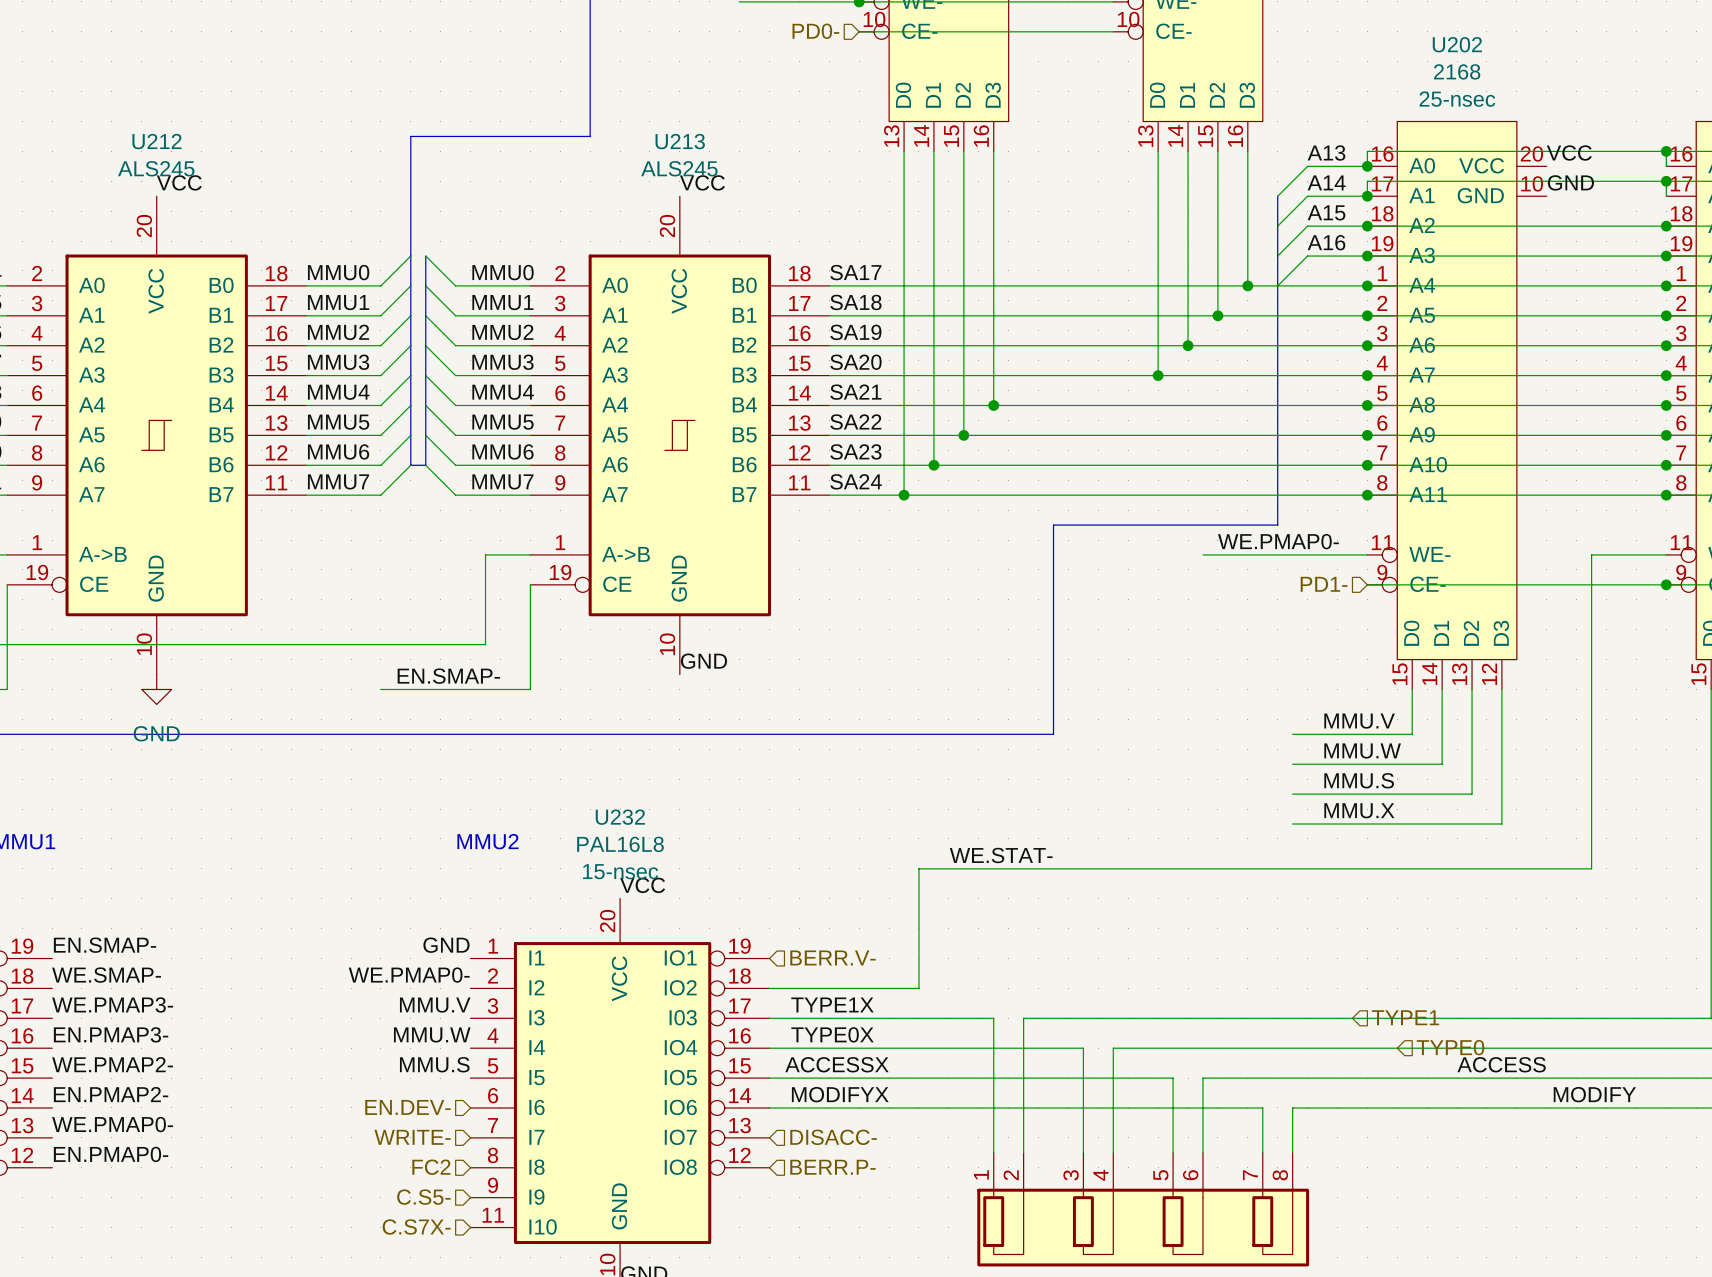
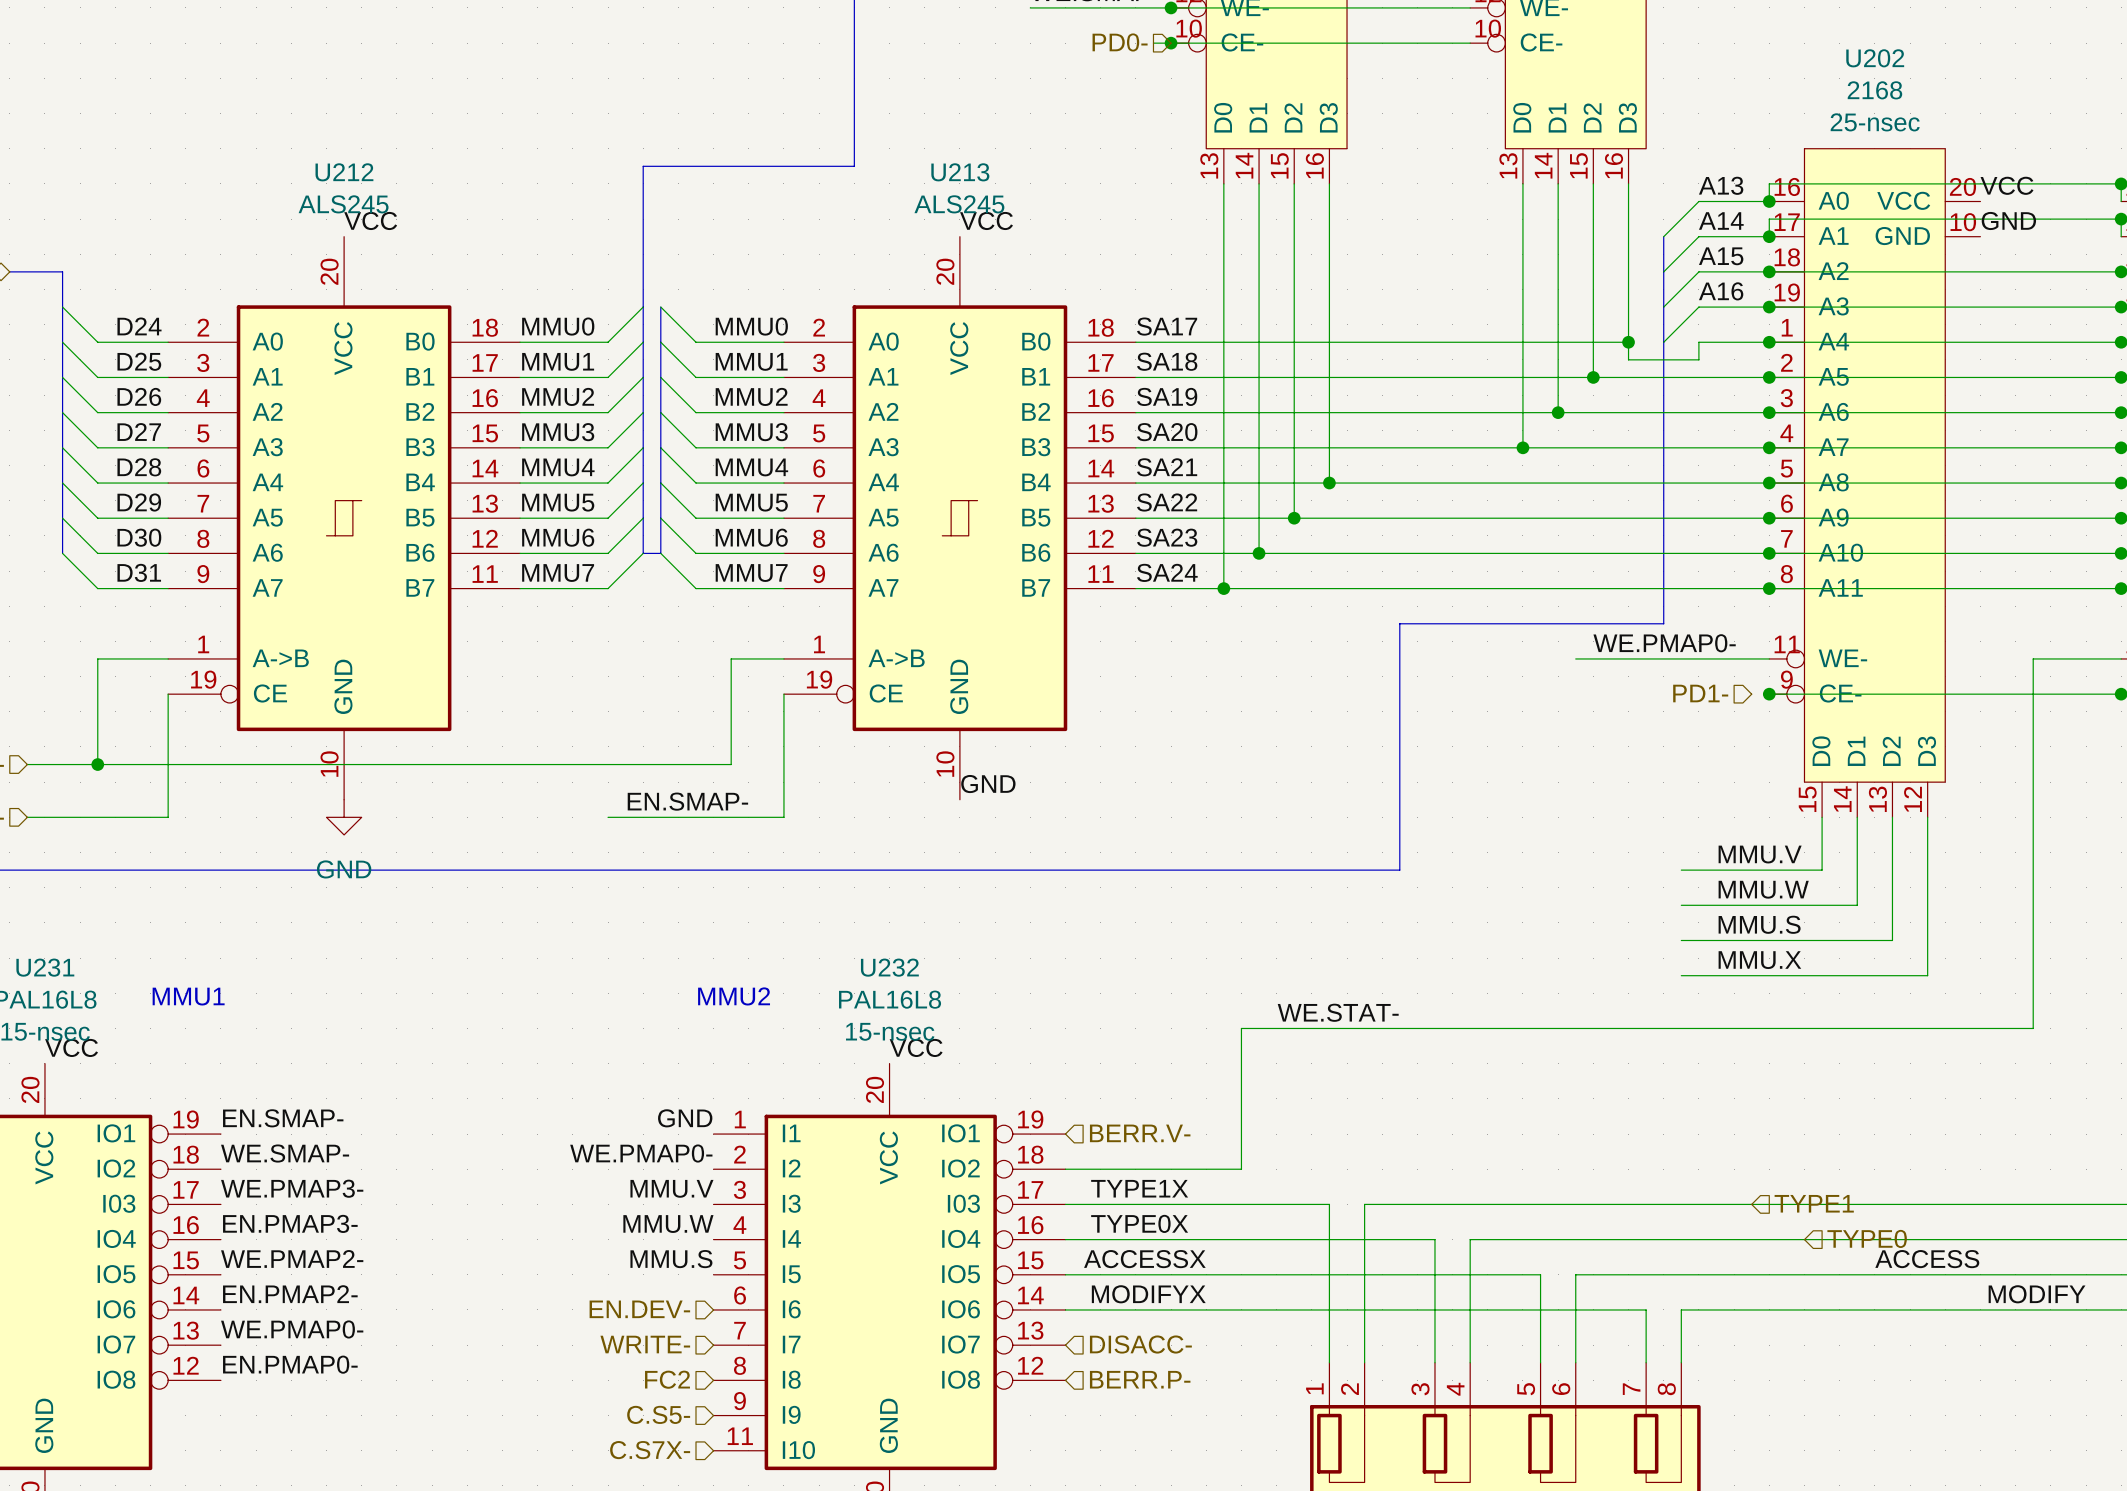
wire: none -> (1153, 43) (1171, 43)
junction: none -> (1171, 43)
wire: (1247, 285) (1307, 285) -> (1628, 342) (1628, 359) (1698, 359) (1698, 342)
hierarchical label position: PD1- (1324, 584) -> PD1- (1700, 693)
junction: none -> (1769, 694)

